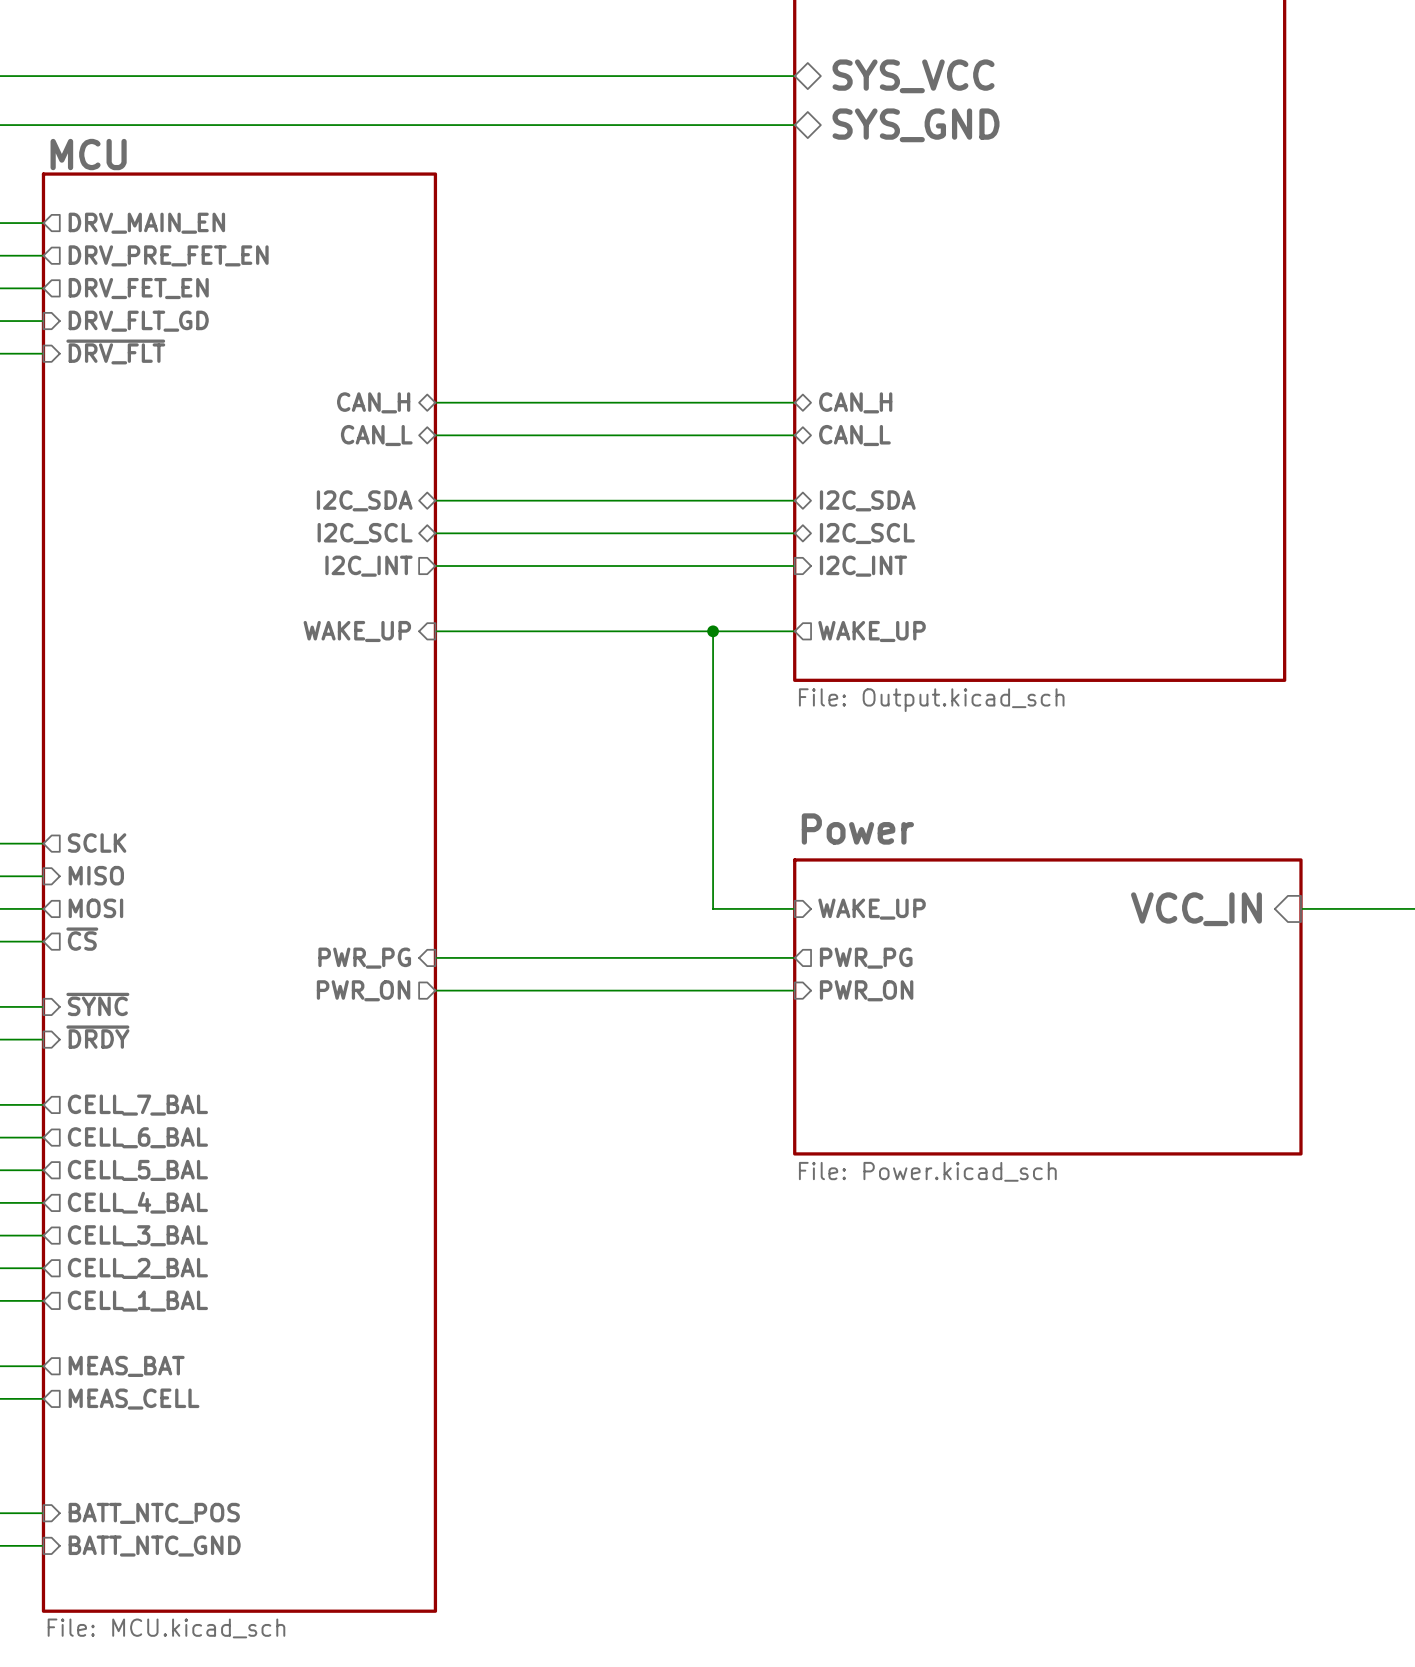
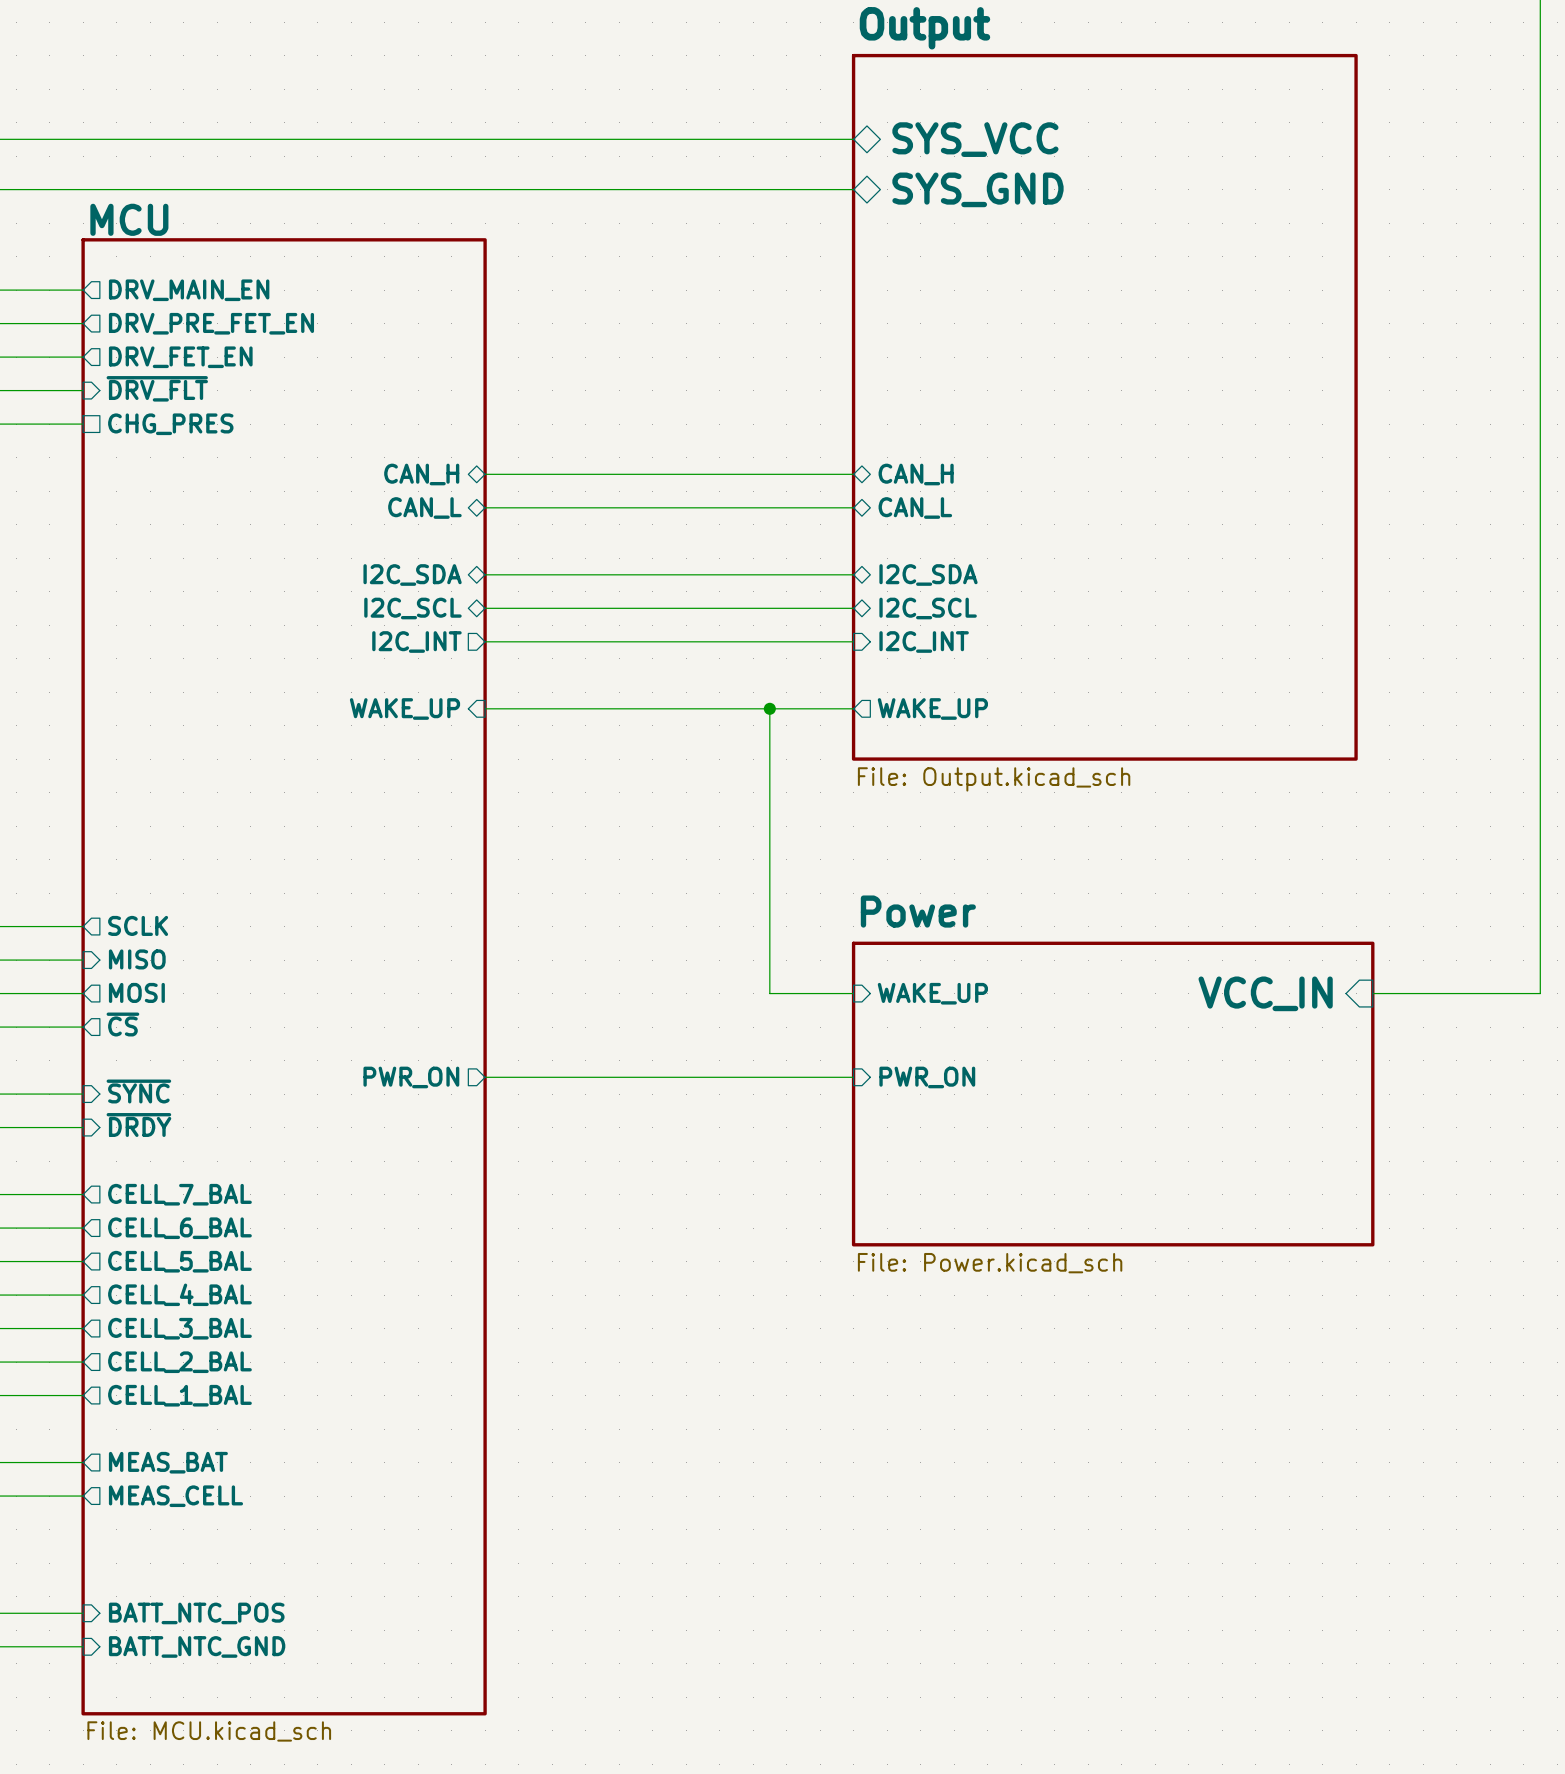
sheet pin: DRV_FLT_GD (138, 321) -> ~{DRV_FLT} (157, 388)
sheet pin shape: input (115, 351) -> passive (170, 424)
sheet pin: ~{DRV_FLT} (115, 351) -> CHG_PRES (170, 424)
wire: (435, 957) (794, 957) -> none
sheet pin: PWR_PG (364, 958) -> none
sheet pin: PWR_PG (866, 958) -> none

